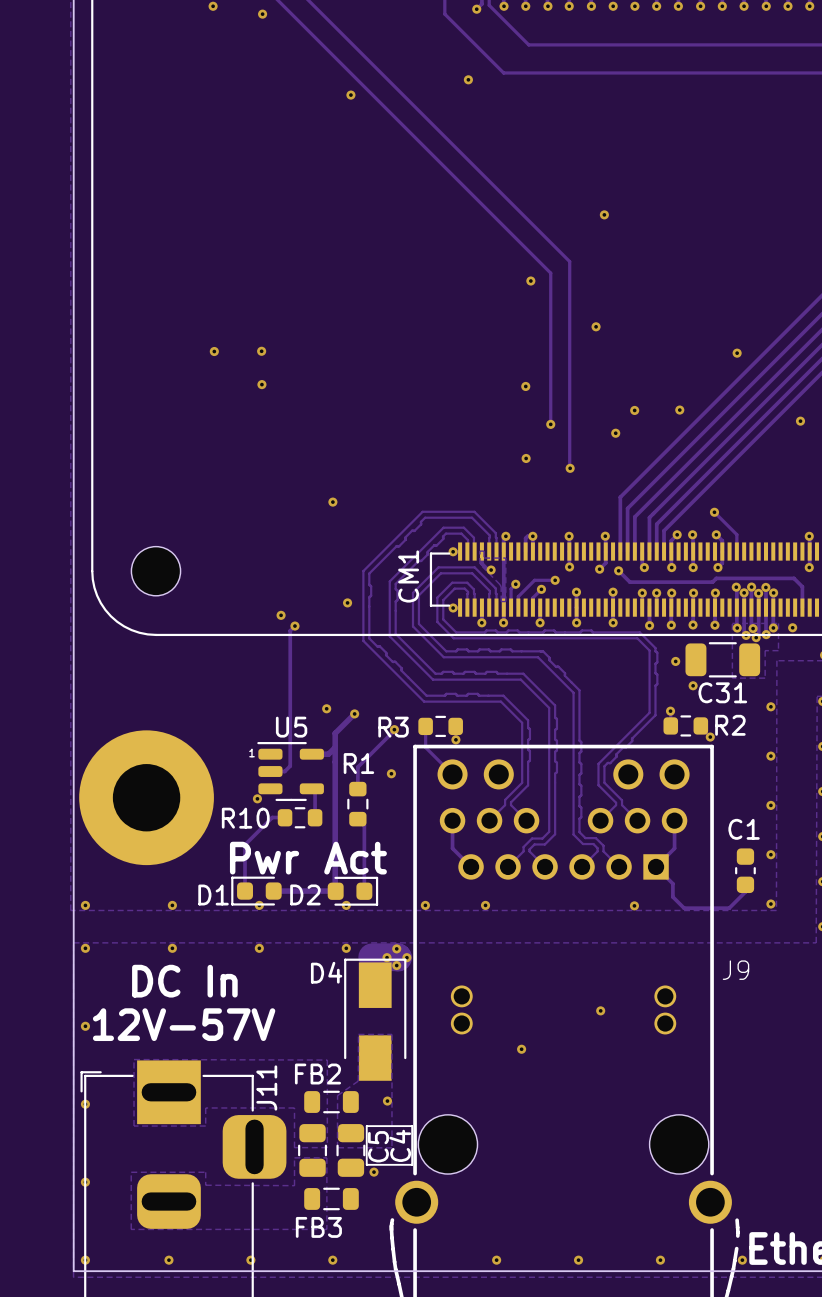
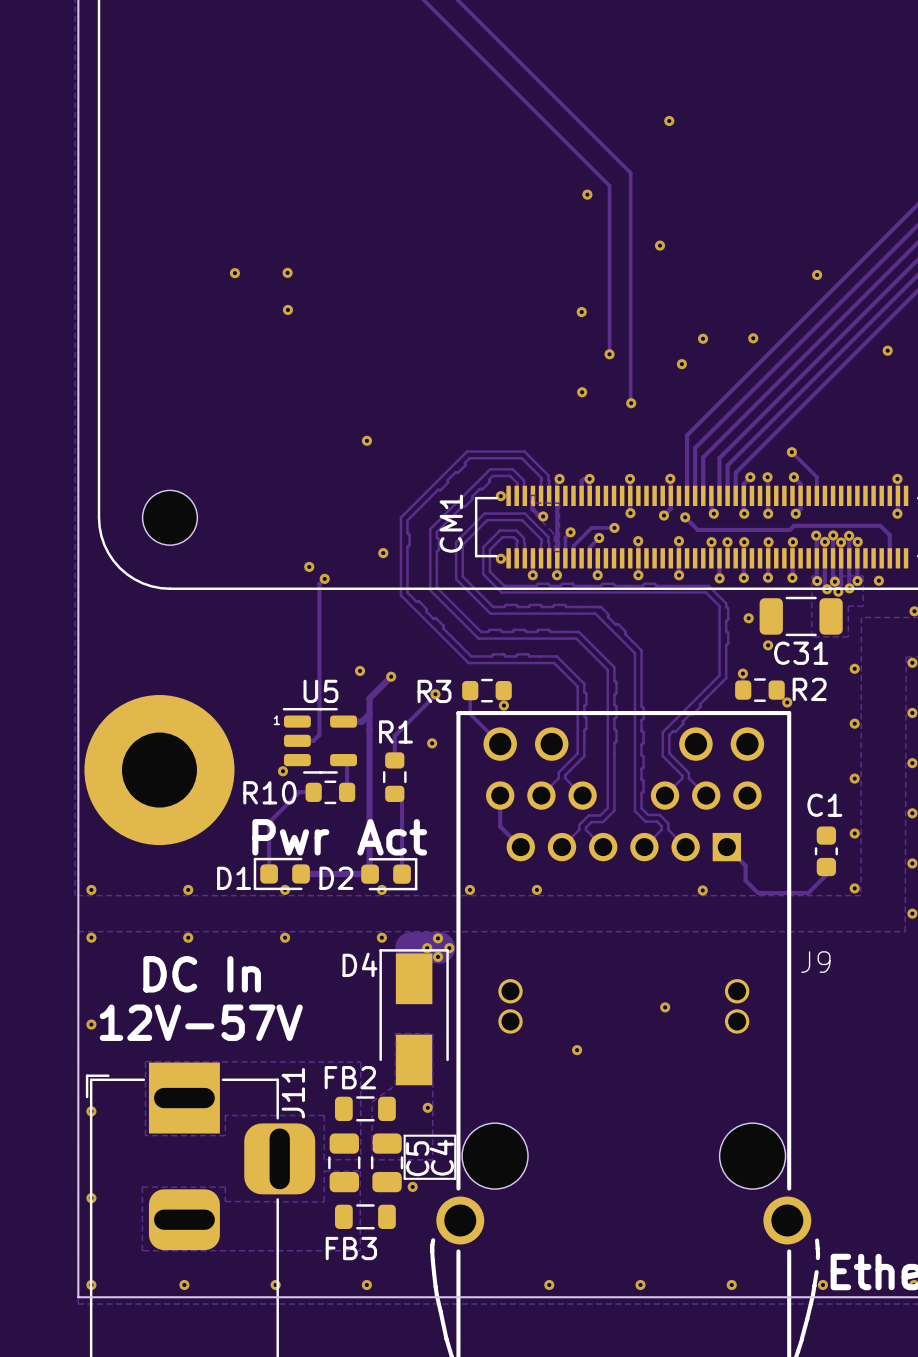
track: (674, 820) (674, 848) (656, 866) -> none

